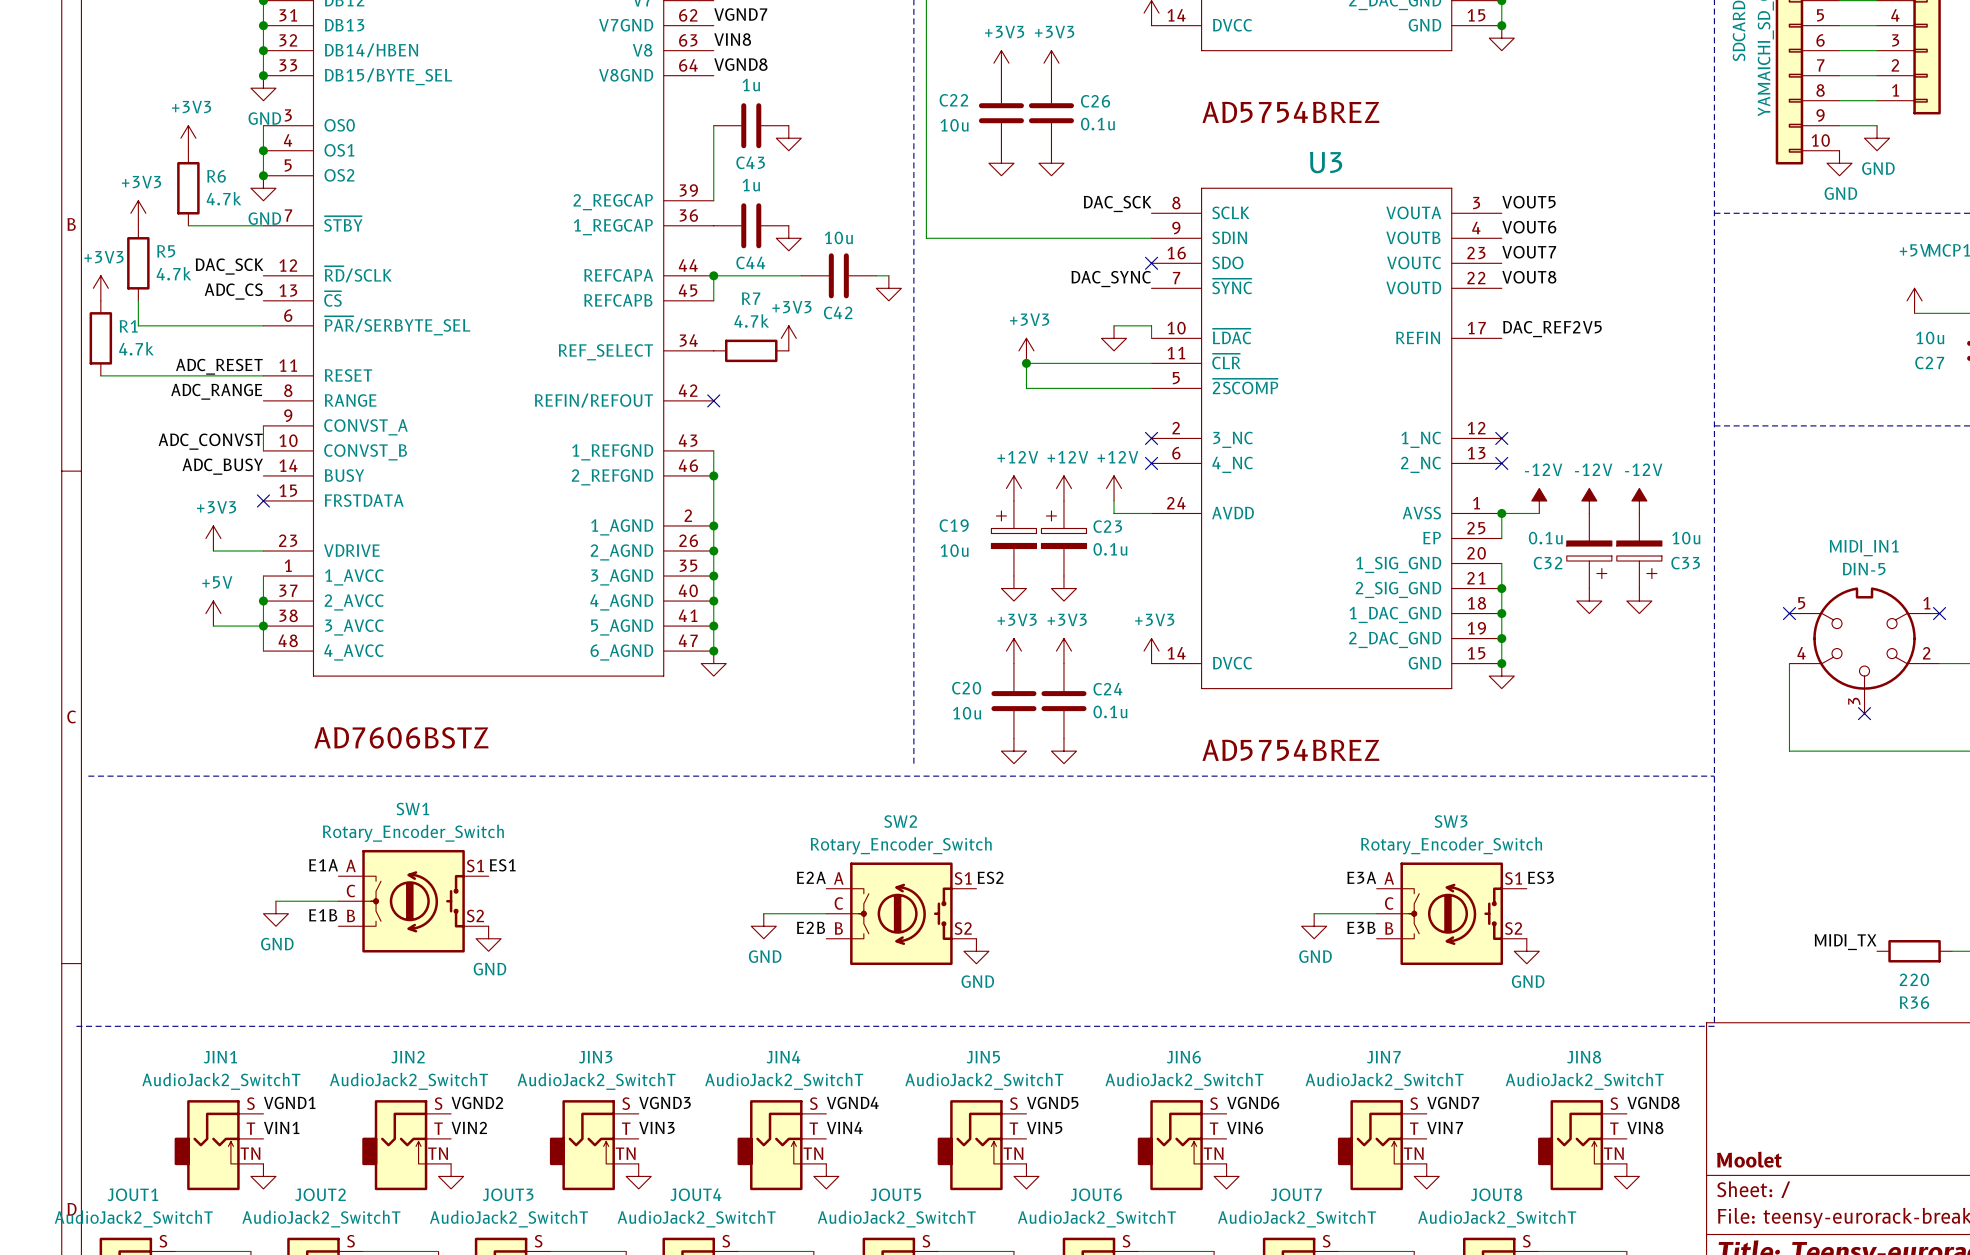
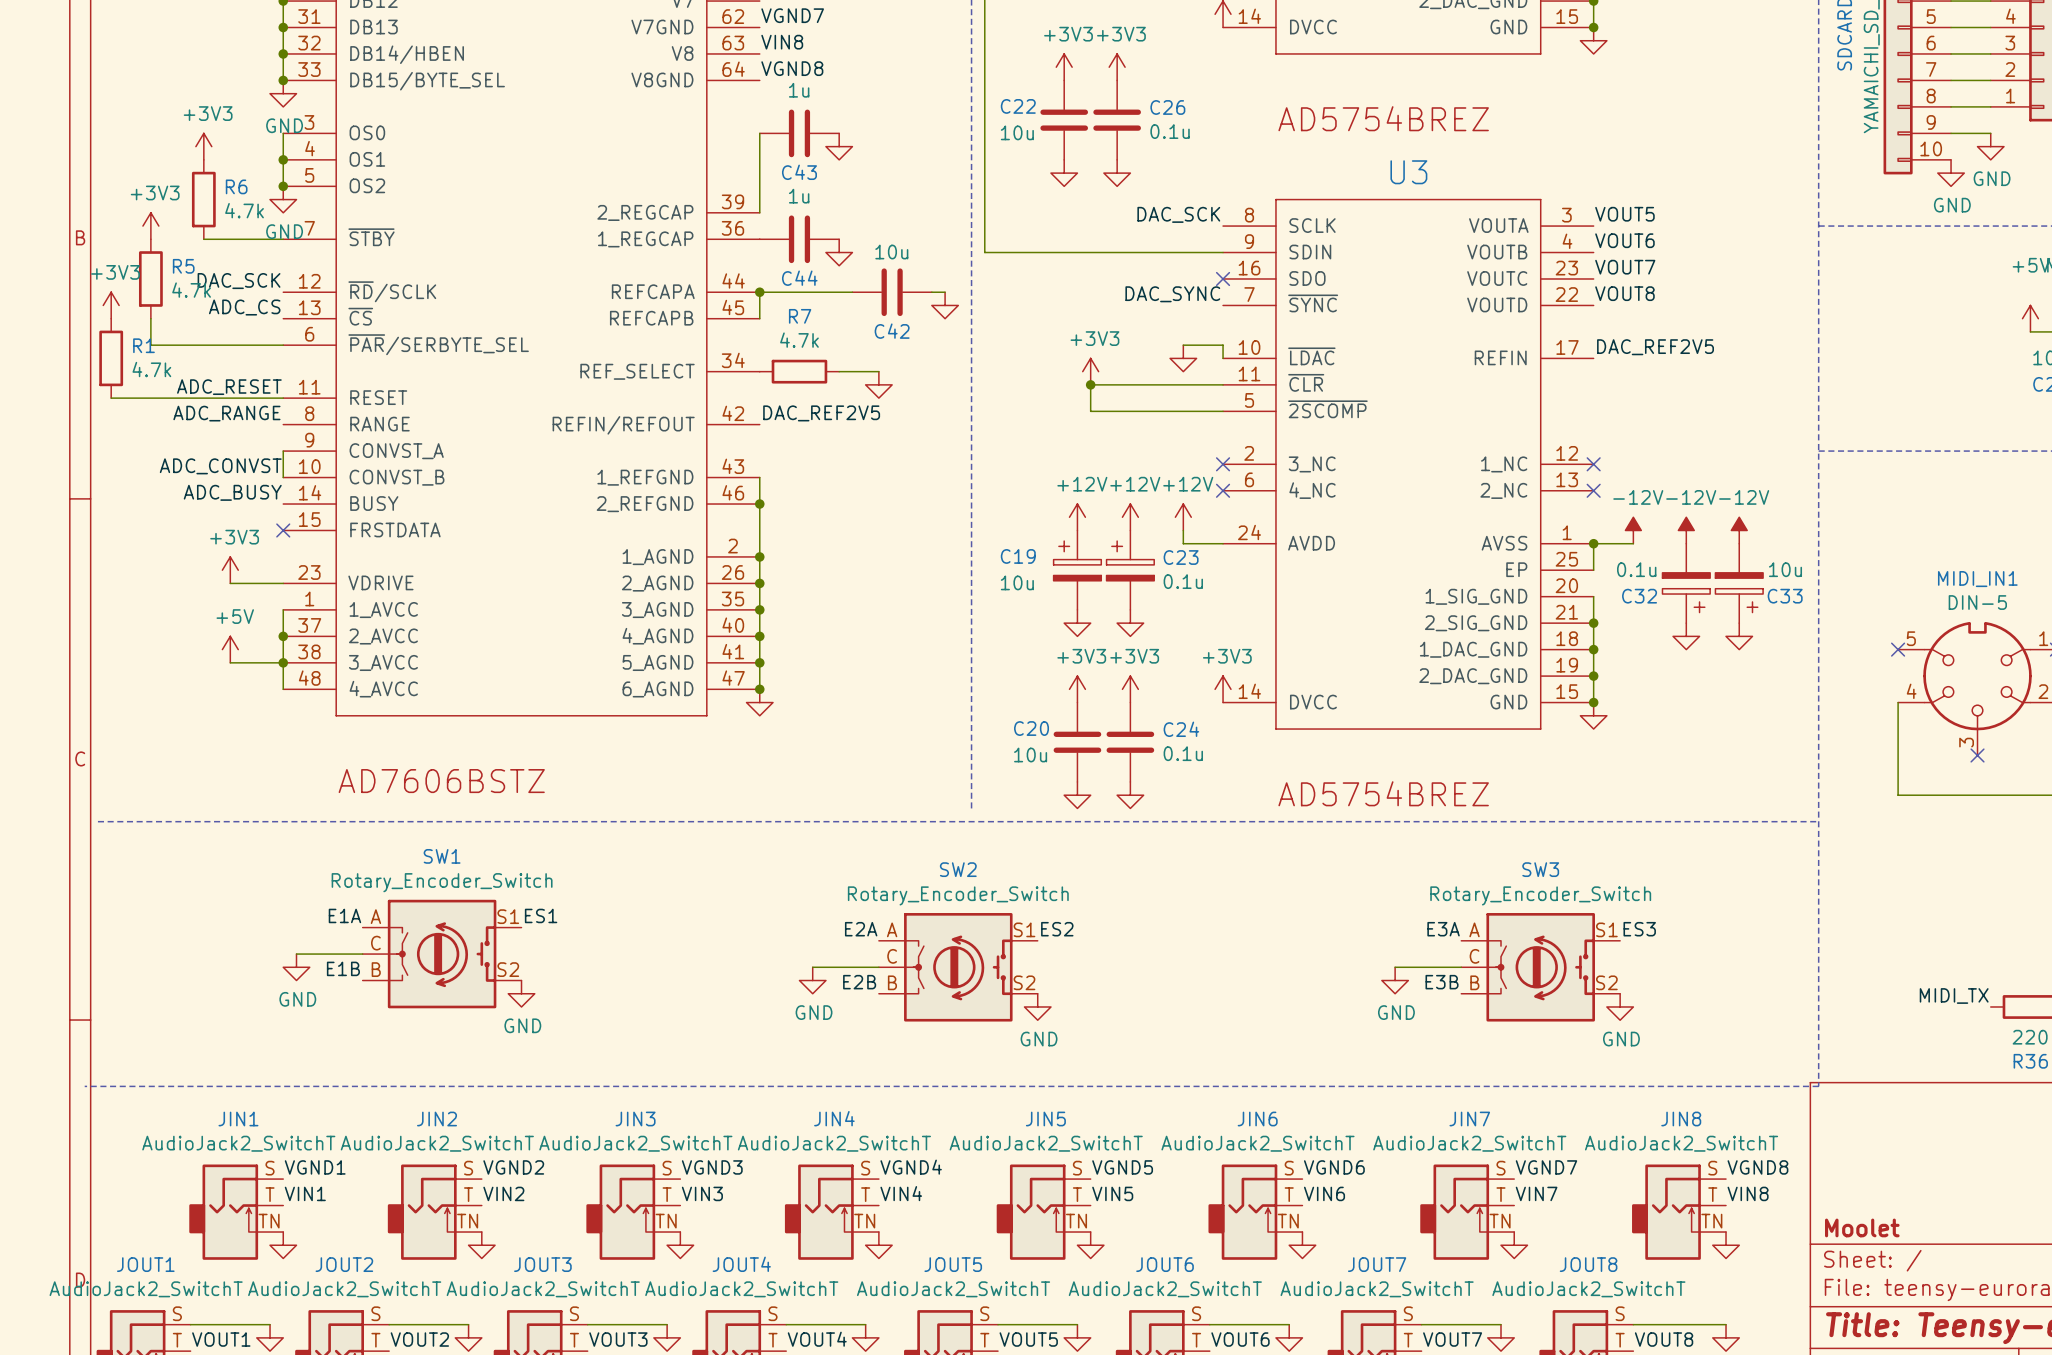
power symbol: +3V3 (788, 338) -> none
wire: none -> (839, 371) (878, 371)
power symbol: none -> (878, 384)
label: none -> DAC_REF2V5 (821, 413)
no-connect mark: (713, 400) -> none

